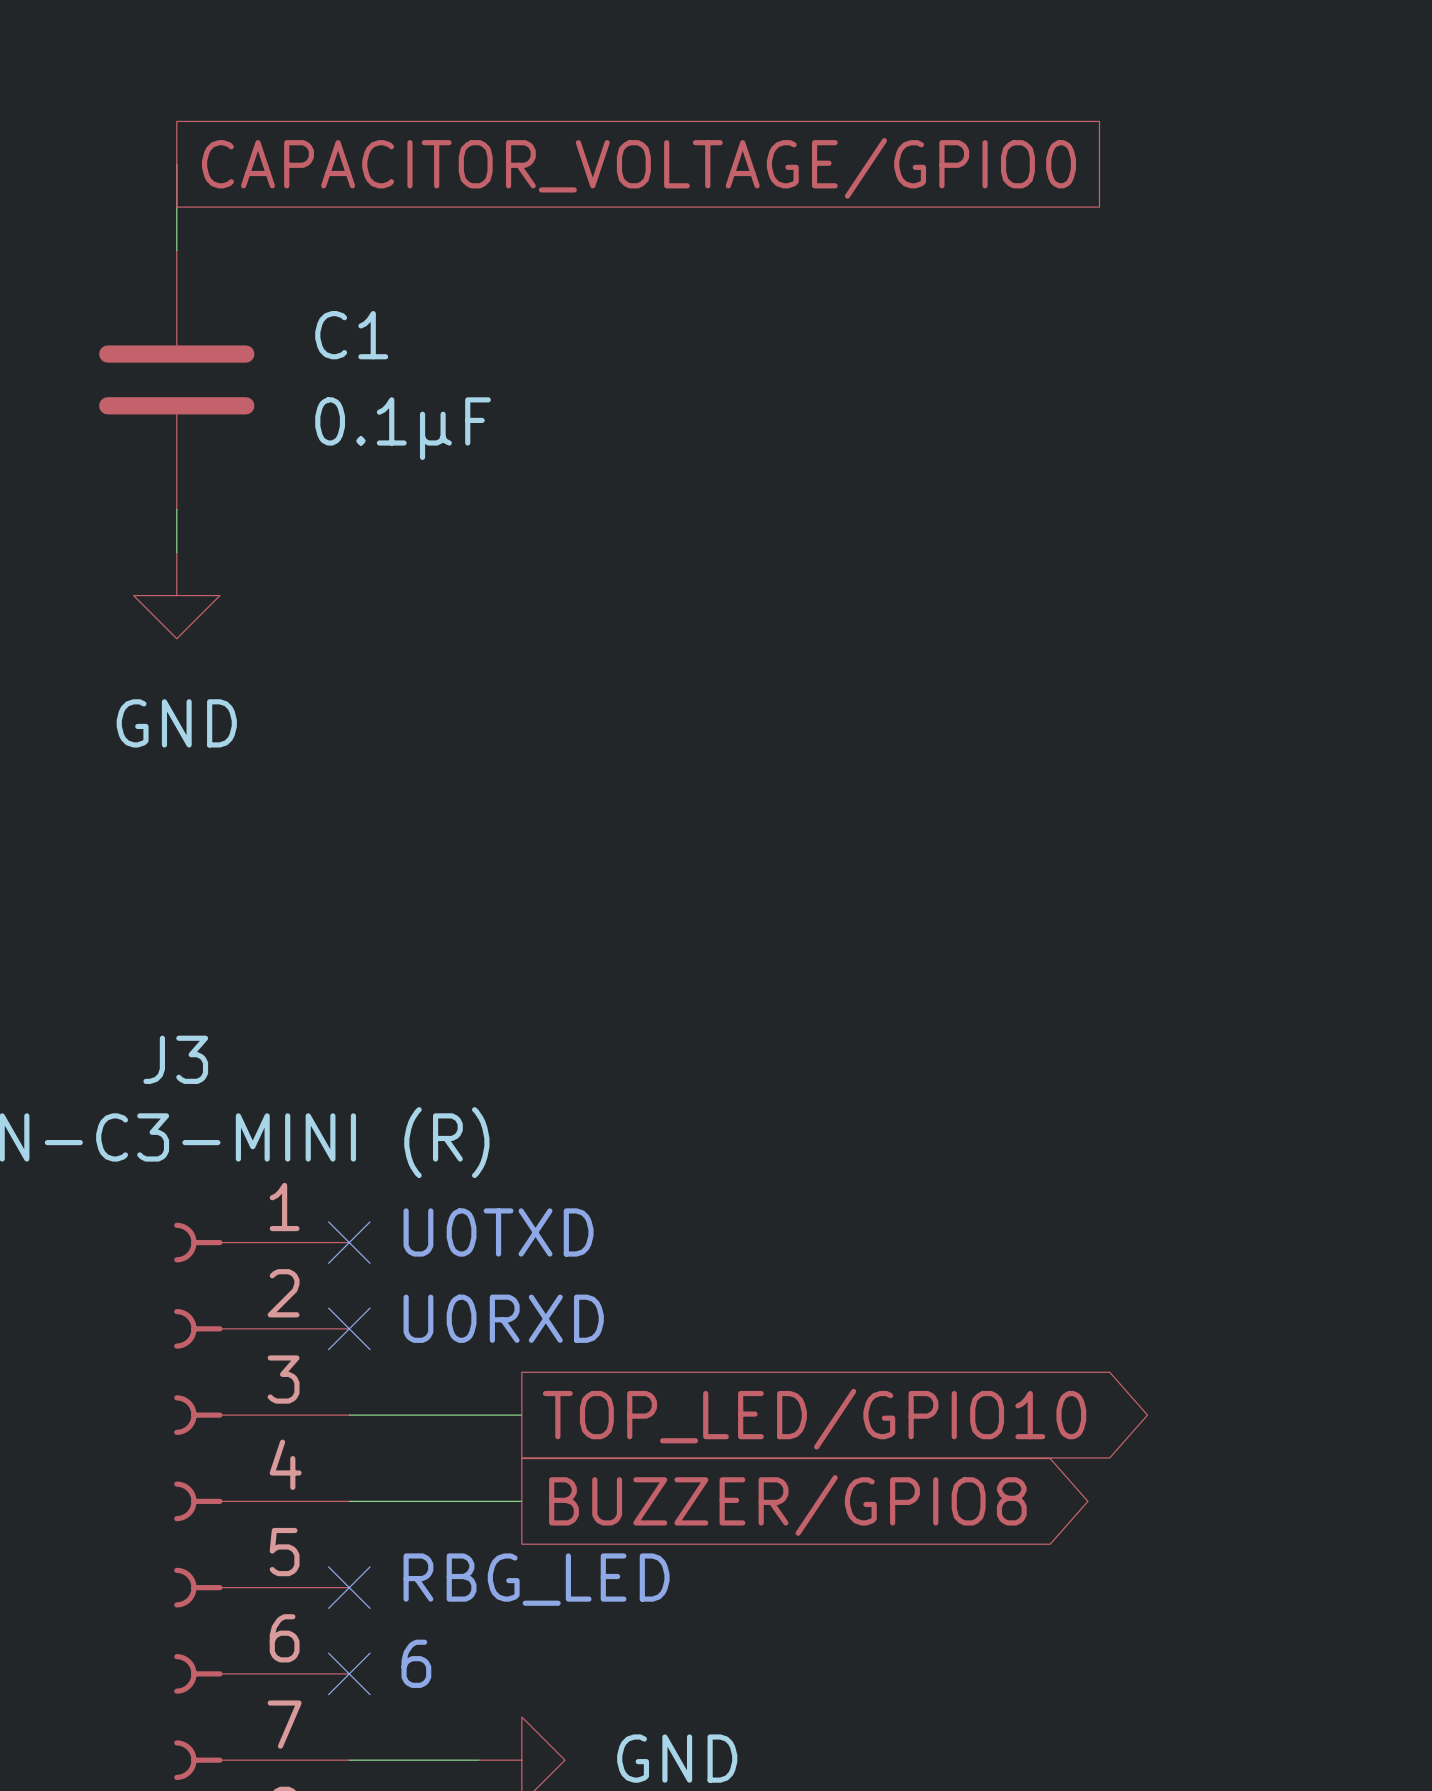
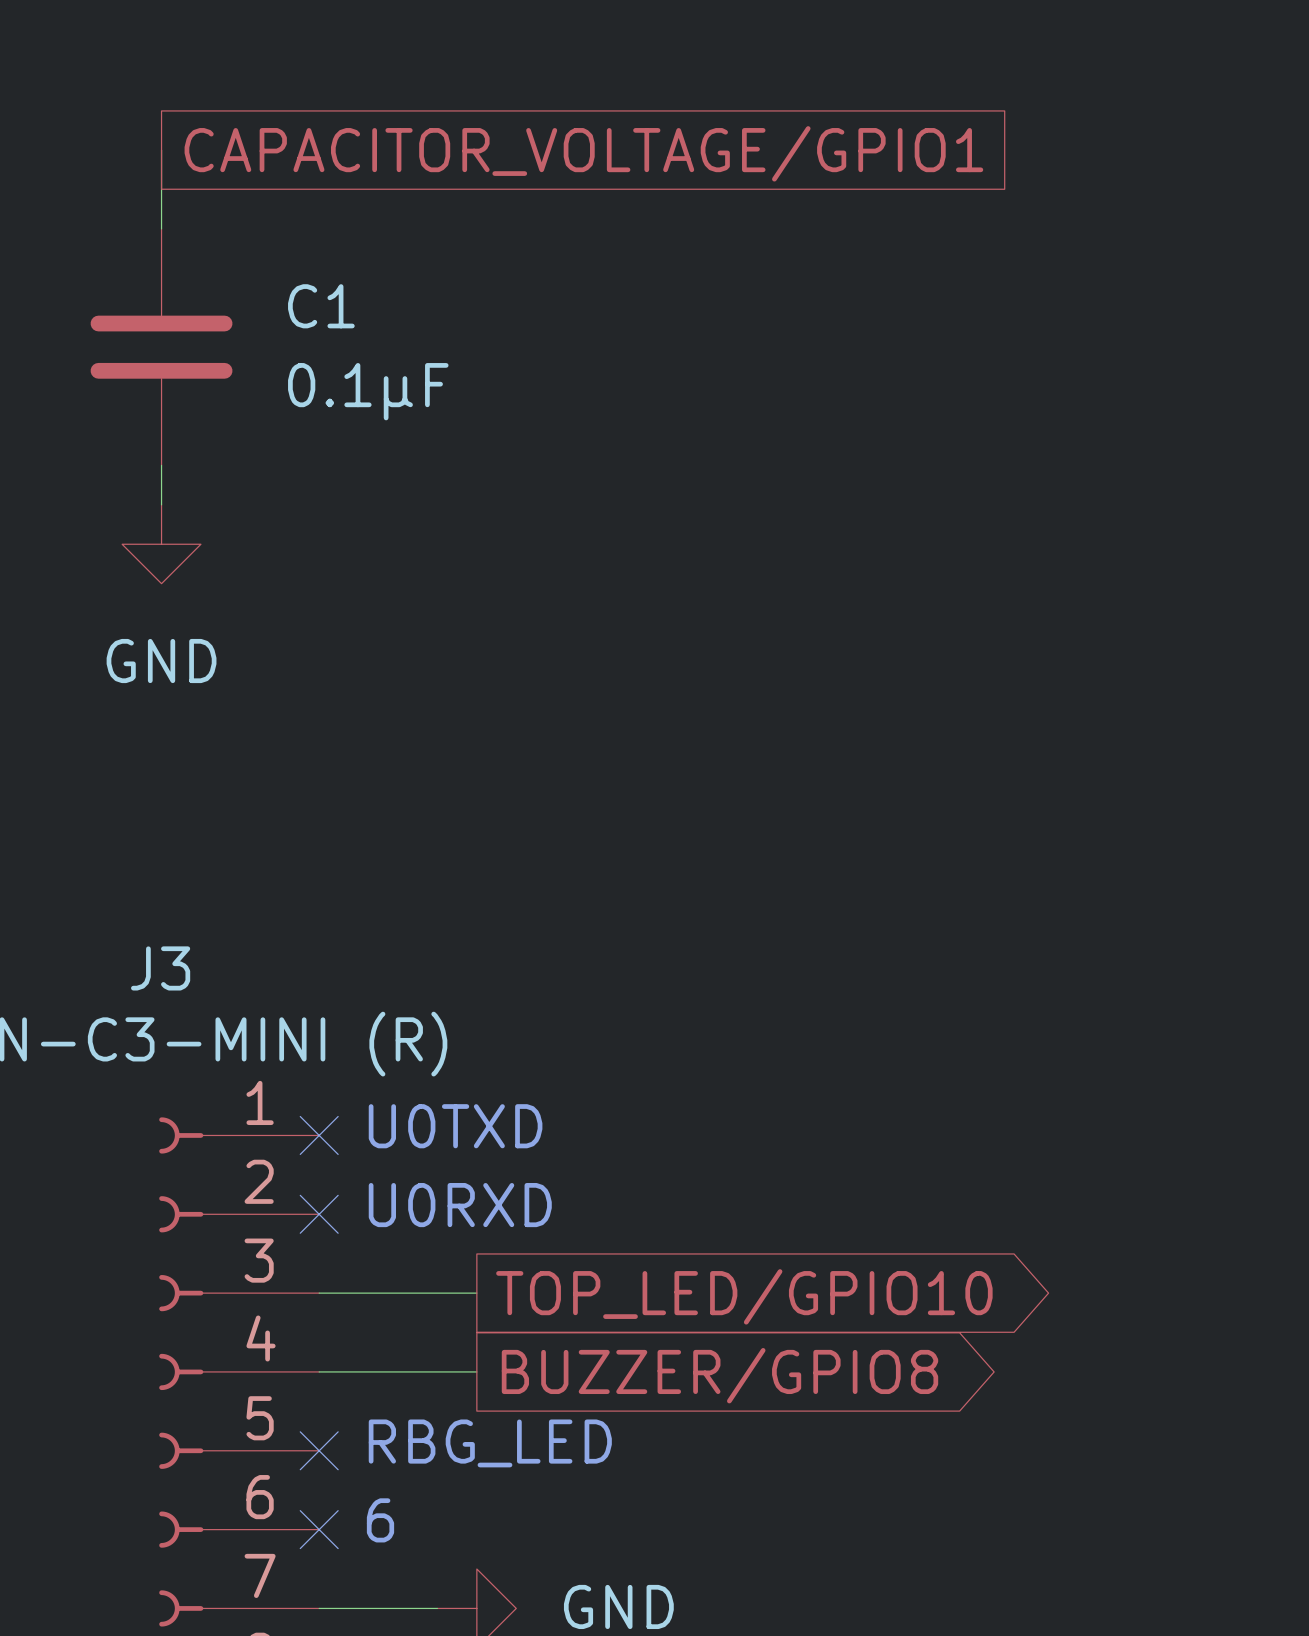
global label: CAPACITOR_VOLTAGE/GPIO0 (638, 168) -> CAPACITOR_VOLTAGE/GPIO1 (583, 153)

